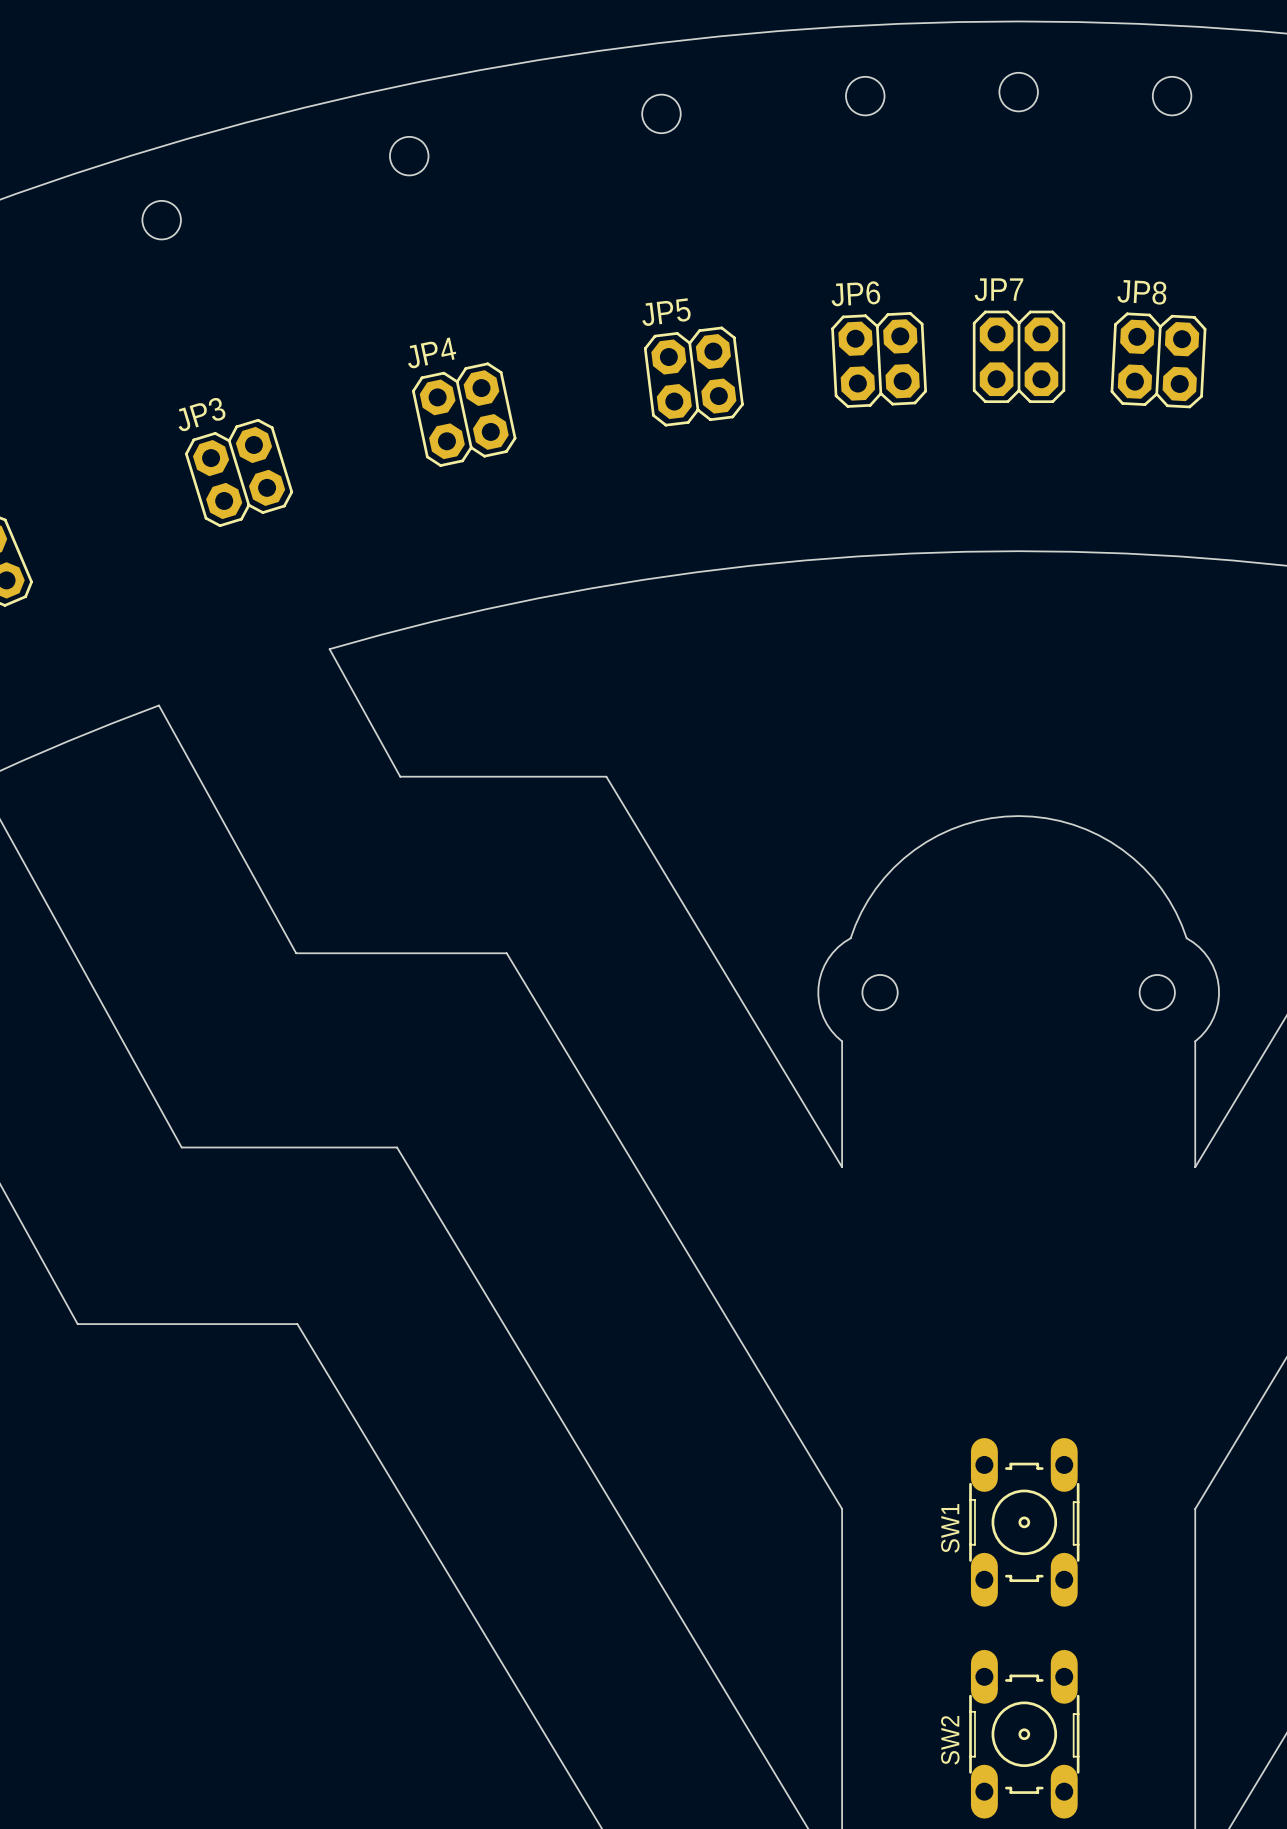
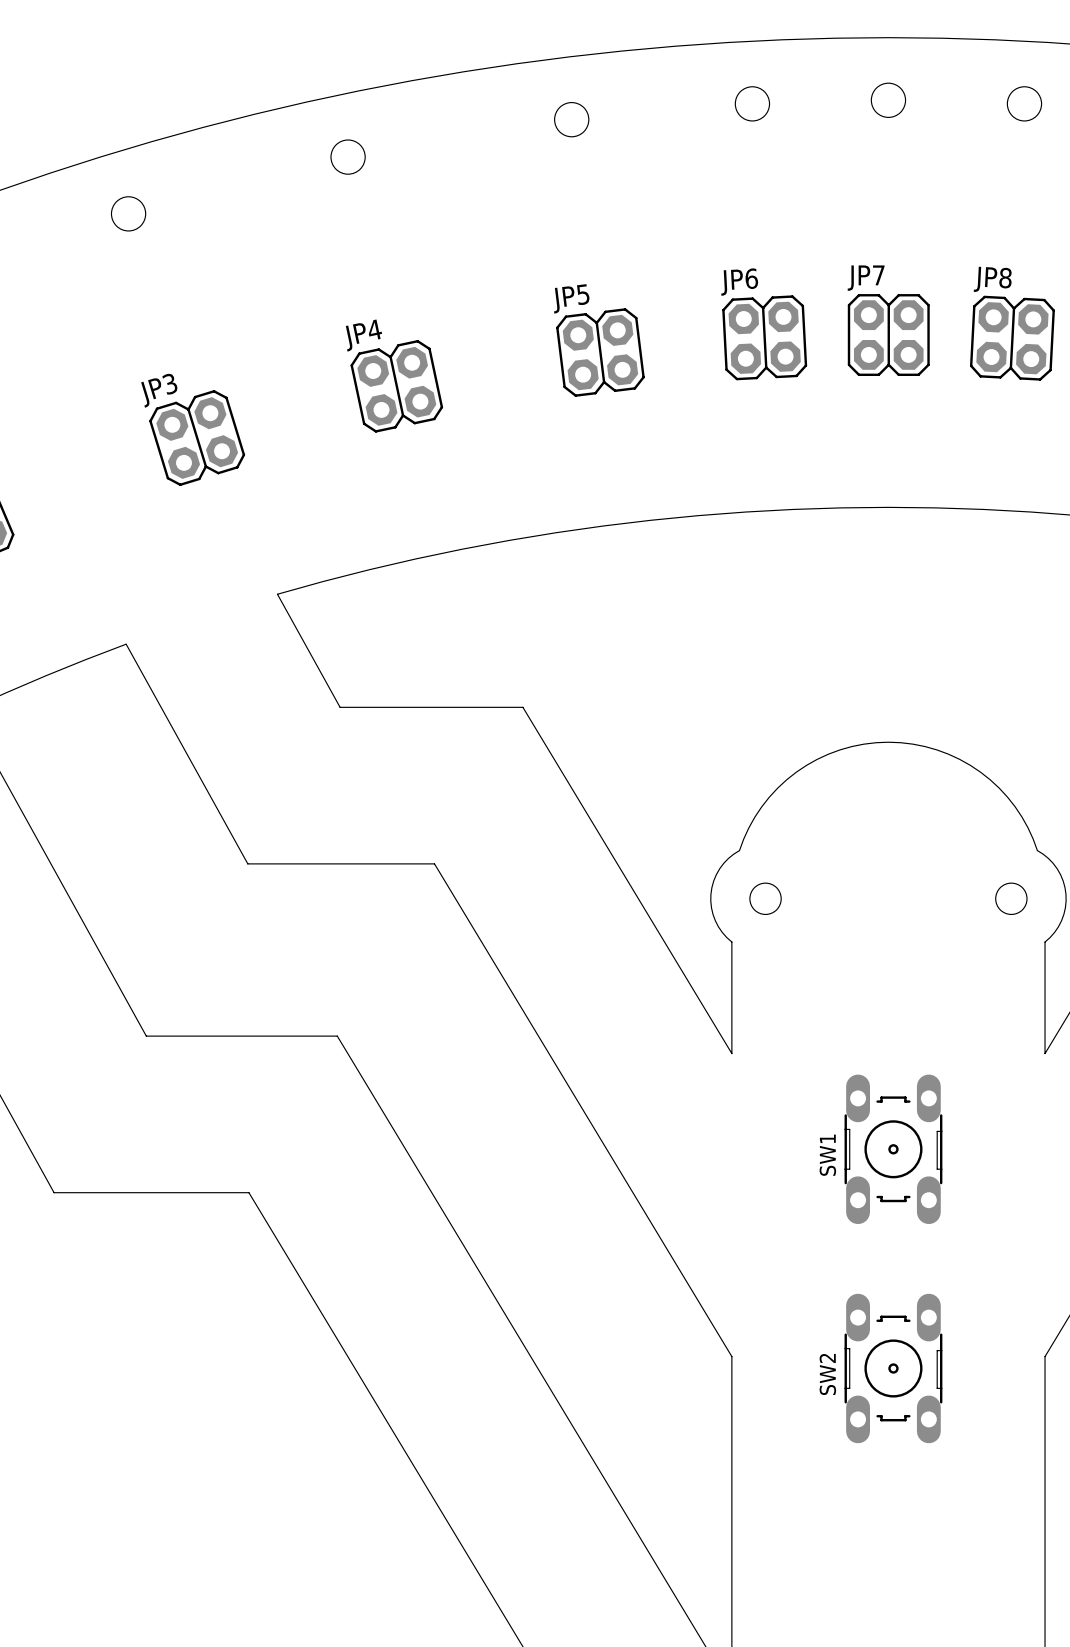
SW1: none -> (893, 1149)
SW1 name: SW1 (950, 1528) -> SW2 (827, 1374)
SW2: (1024, 1734) -> none

